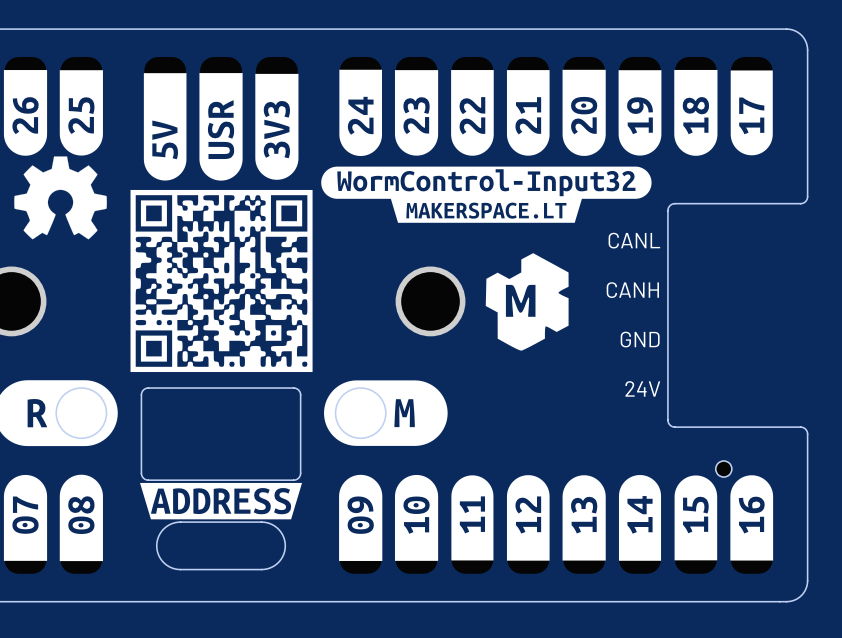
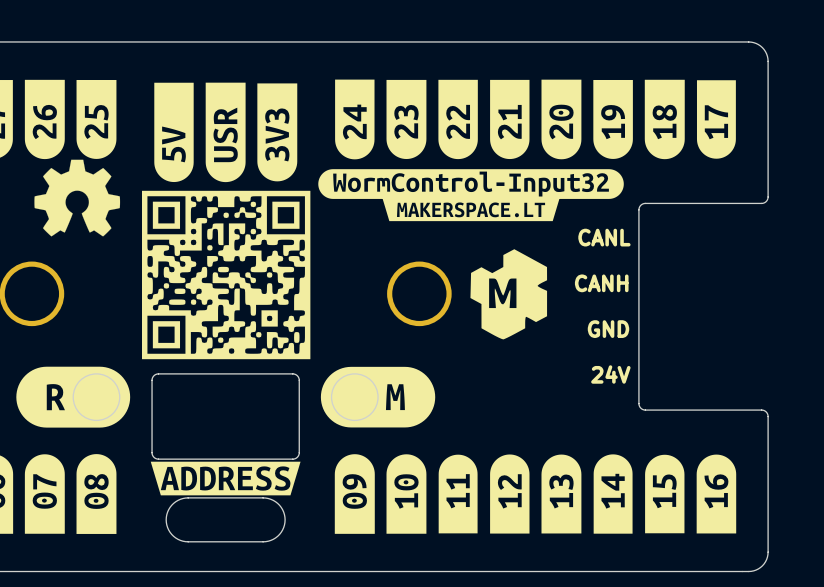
drawing shape: [130, 189, 313, 373] -> [142, 190, 311, 360]
part: (723, 469) -> none

